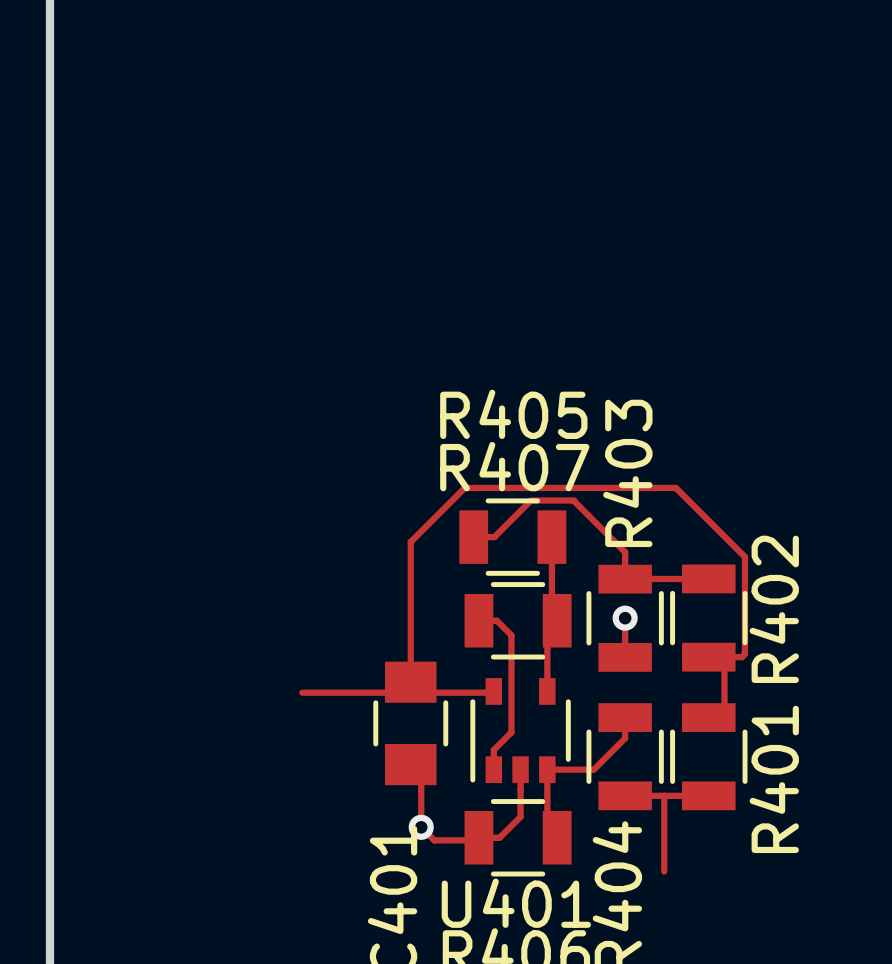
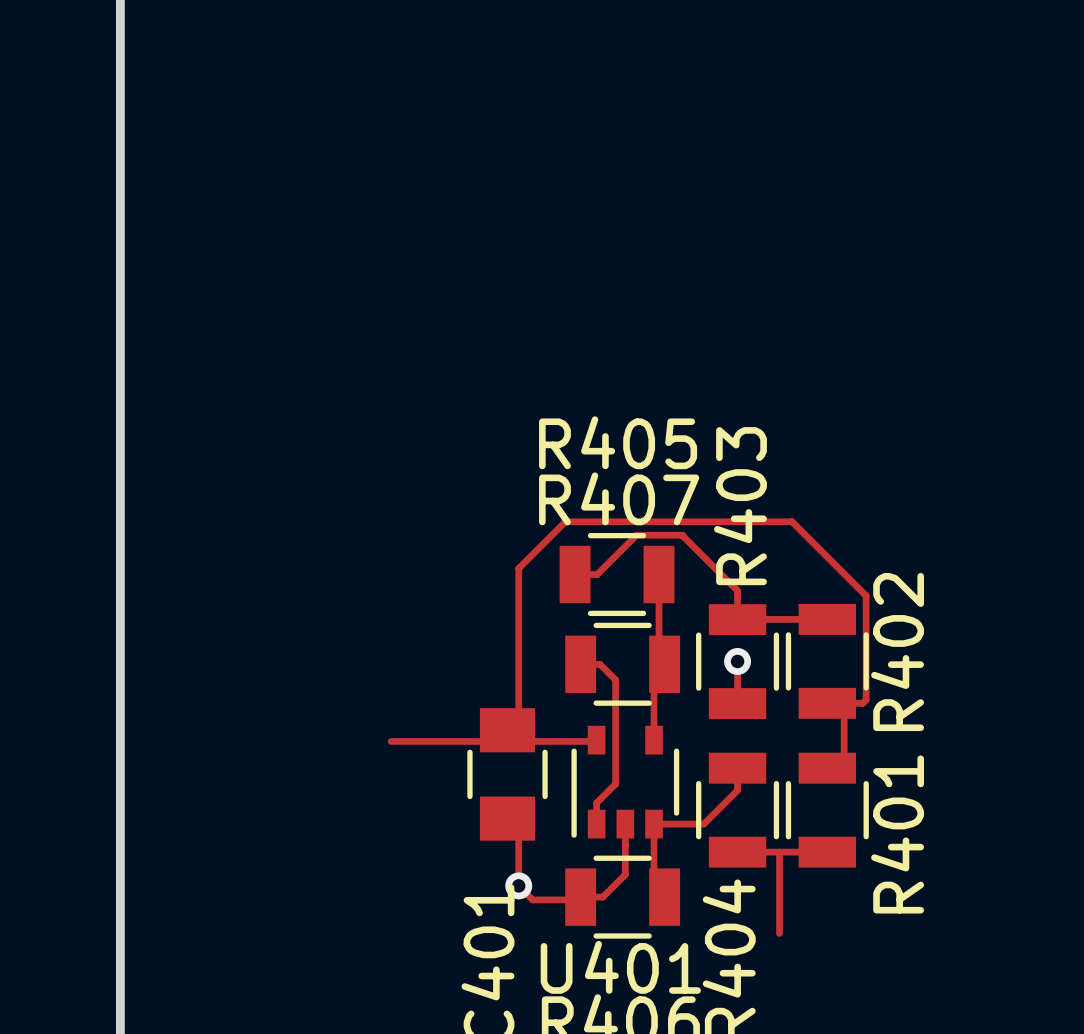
top track: (421, 531) (410, 541) (410, 682) -> (518, 568) (518, 741)

